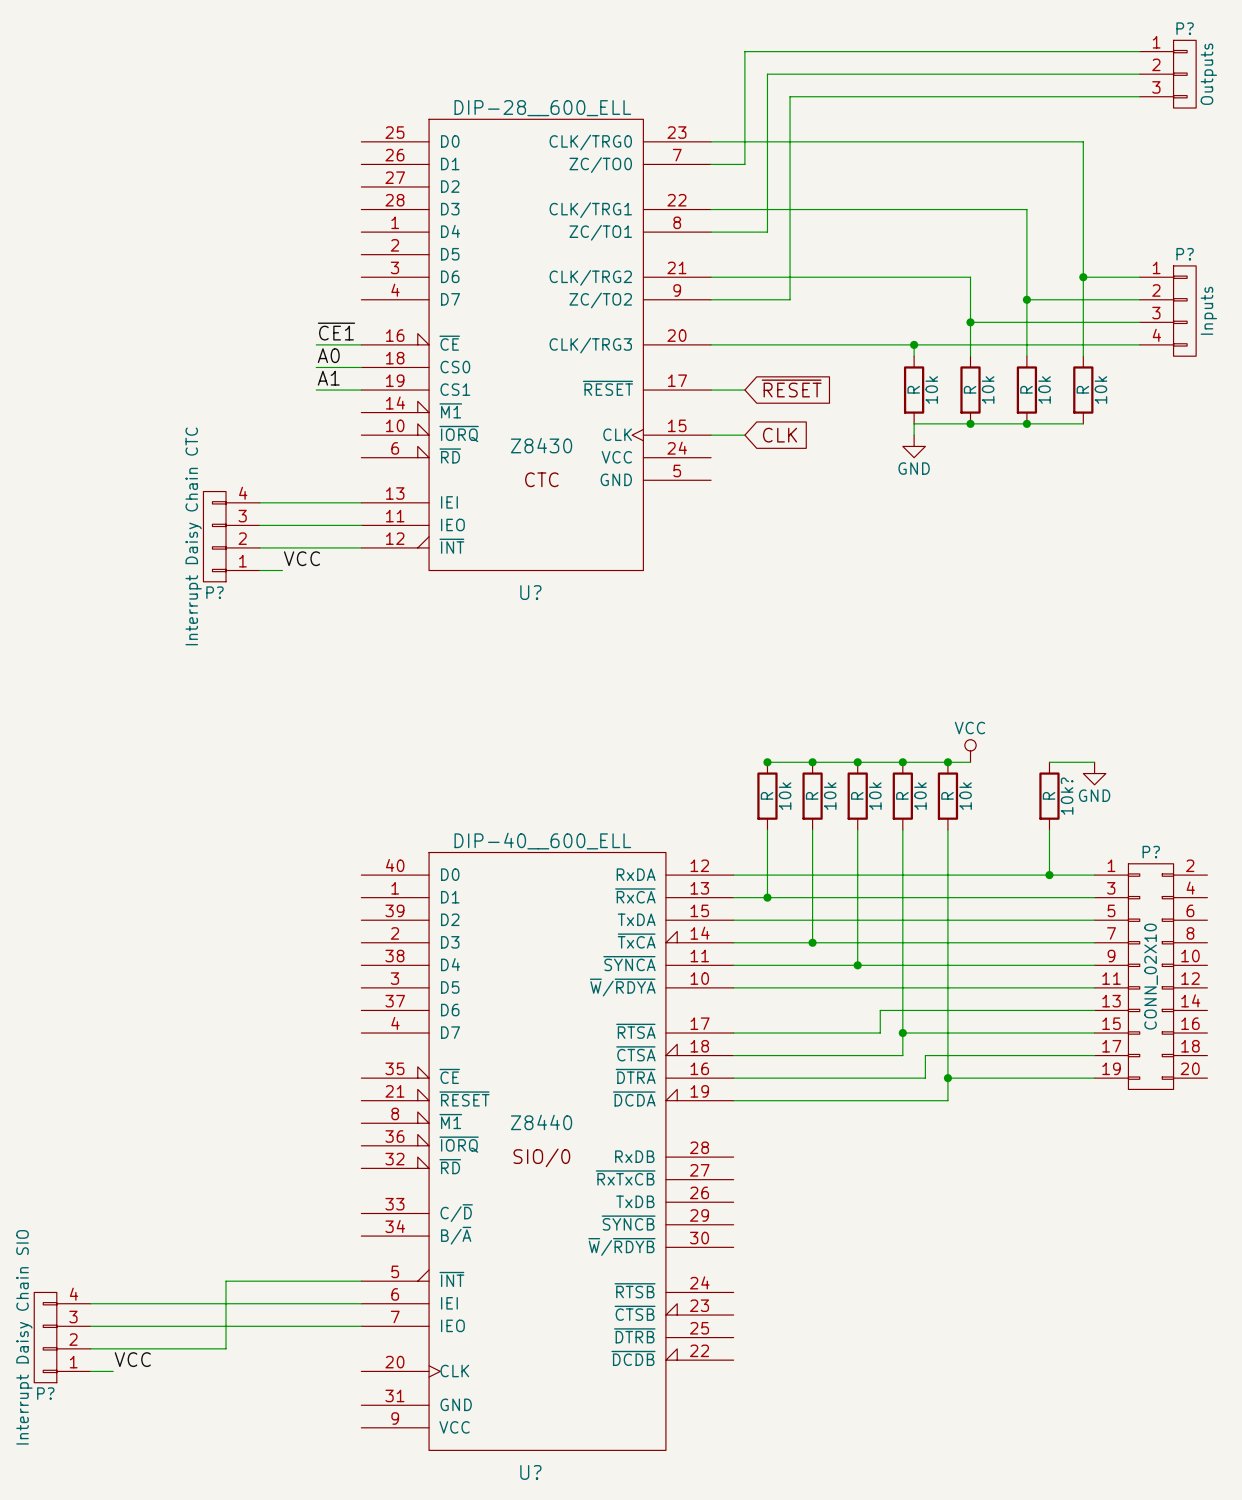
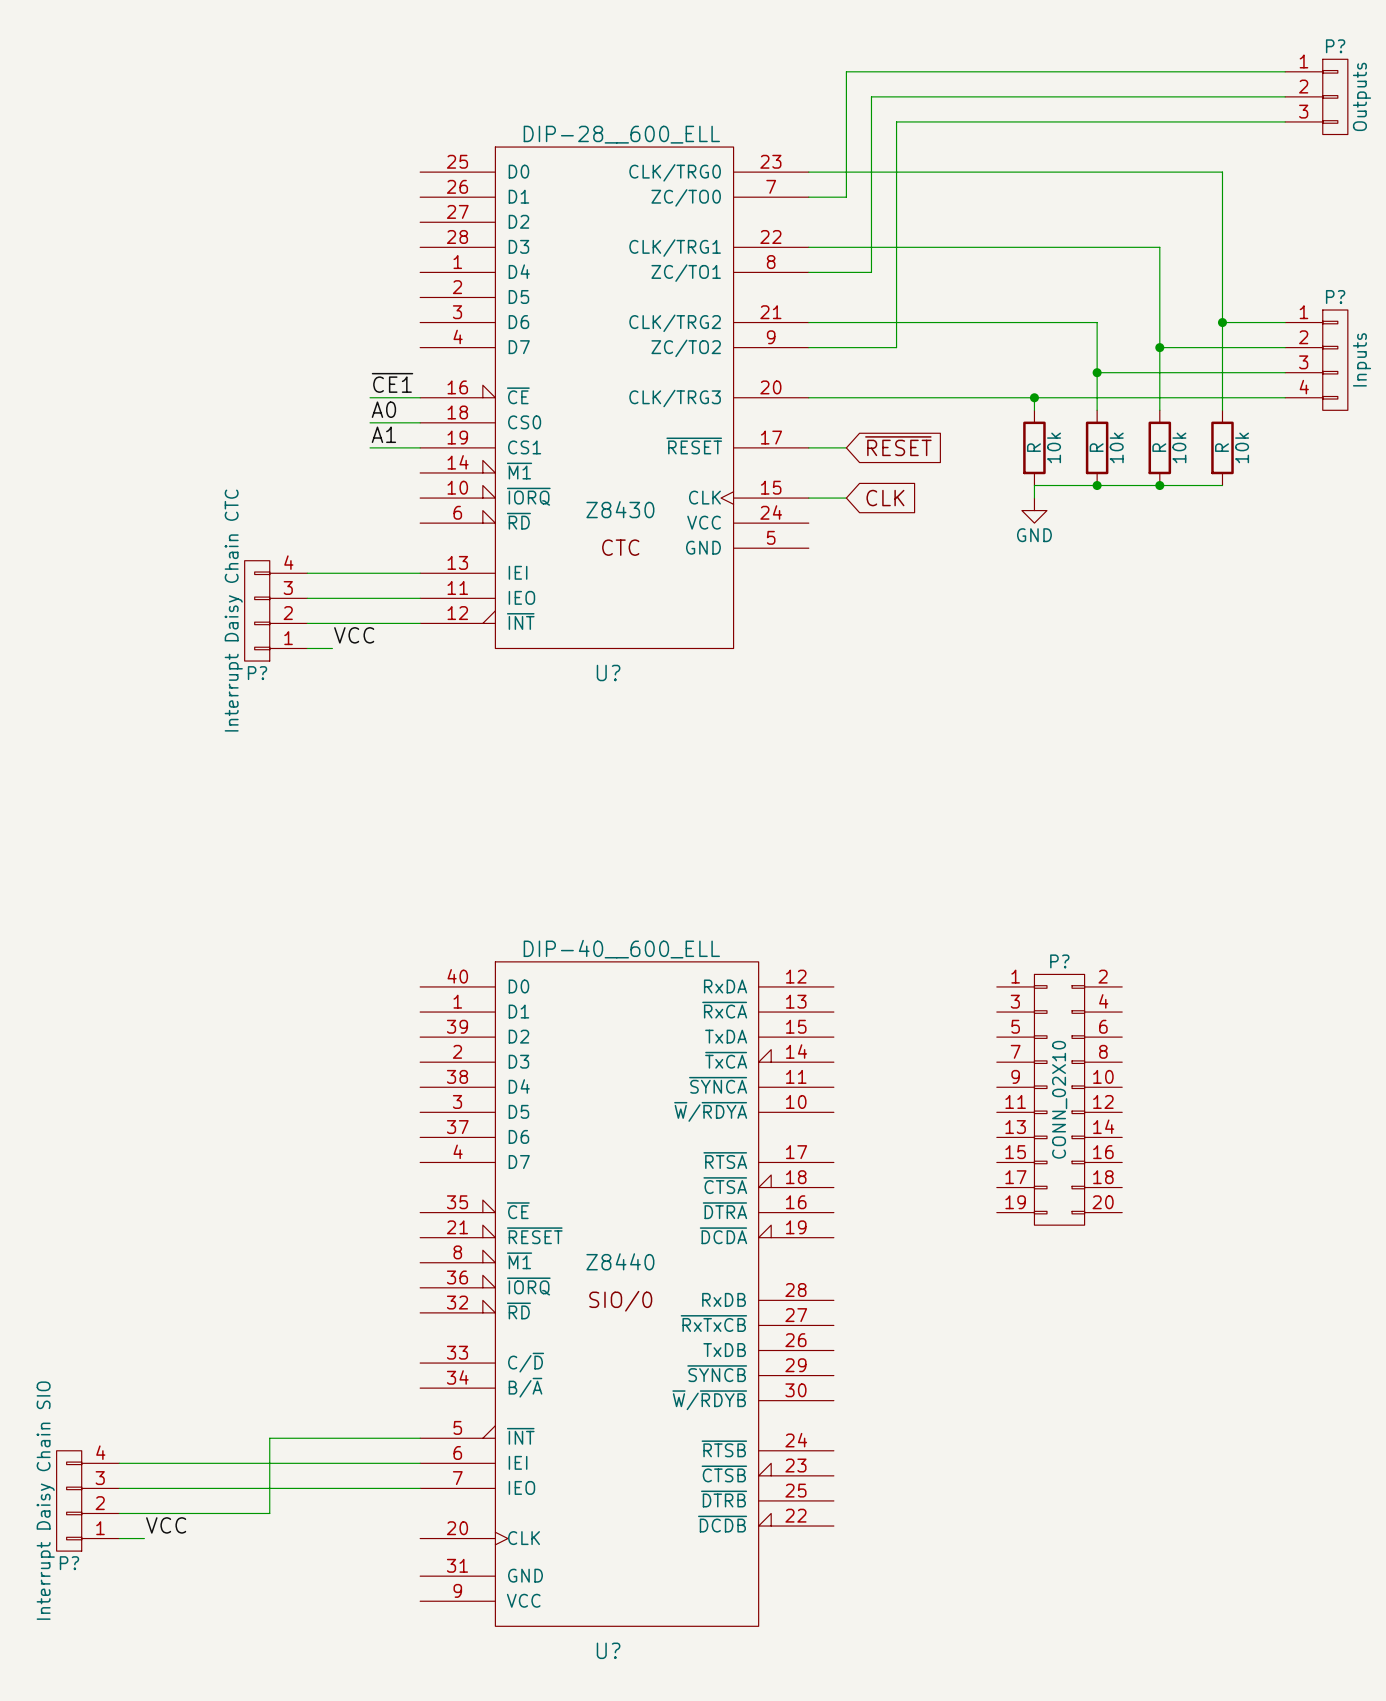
power symbol: VCC (970, 751) -> none
wire: (767, 762) (970, 762) -> none
junction: (767, 762) -> none
junction: (812, 762) -> none
junction: (857, 762) -> none
junction: (902, 762) -> none
junction: (947, 762) -> none
wire: (1049, 762) (1094, 762) -> none
power symbol: GND (1094, 773) -> none
10k: R (767, 796) -> none
10k: R (812, 796) -> none
10k: R (857, 796) -> none
10k: R (902, 796) -> none
10k: R (947, 796) -> none
10k?: R (1049, 796) -> none
wire: (767, 829) (767, 897) -> none
wire: (812, 829) (812, 942) -> none
wire: (857, 829) (857, 965) -> none
wire: (902, 829) (902, 1055) (733, 1055) -> none
wire: (947, 829) (947, 1100) (733, 1100) -> none
wire: (1049, 829) (1049, 875) -> none
wire: (733, 875) (1094, 875) -> none
junction: (1049, 875) -> none
wire: (733, 897) (1094, 897) -> none
junction: (767, 897) -> none
wire: (733, 920) (1094, 920) -> none
wire: (733, 942) (1094, 942) -> none
junction: (812, 942) -> none
wire: (733, 965) (1094, 965) -> none
junction: (857, 965) -> none
P? position: (1150, 976) -> (1059, 1099)
wire: (733, 987) (1094, 987) -> none
wire: (1094, 1010) (880, 1010) (880, 1033) (733, 1033) -> none
wire: (902, 1033) (1094, 1033) -> none
junction: (902, 1033) -> none
wire: (1094, 1055) (925, 1055) (925, 1078) (733, 1078) -> none
wire: (947, 1078) (1094, 1078) -> none
junction: (947, 1078) -> none

